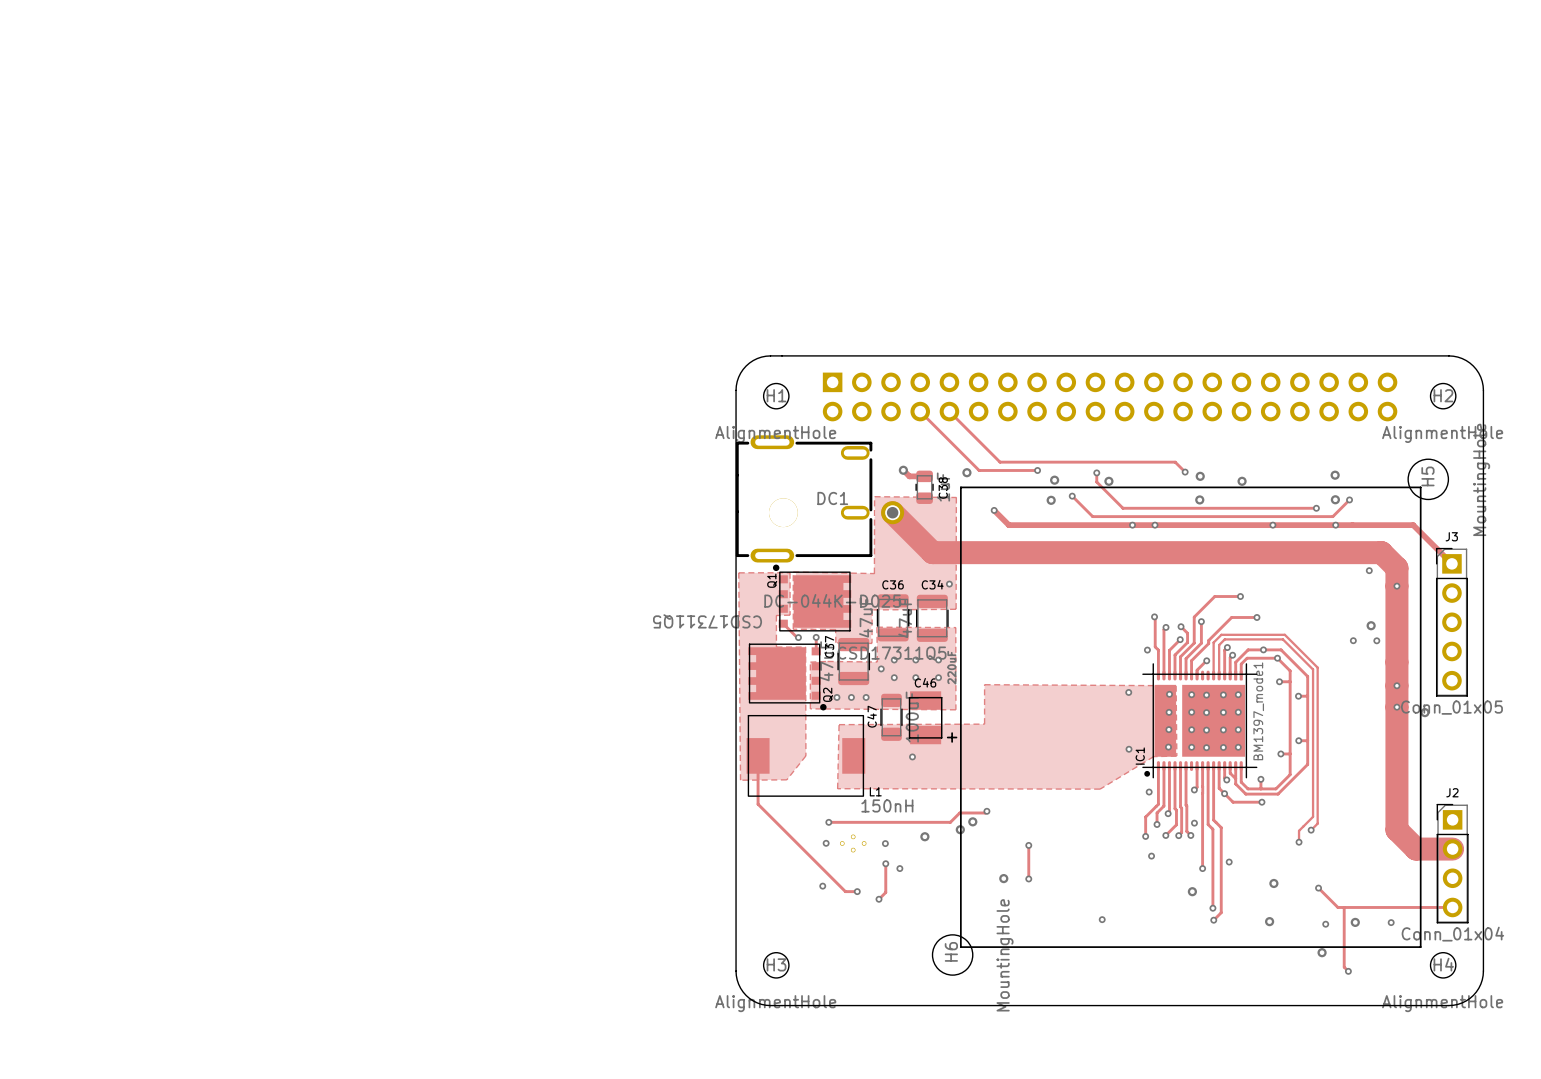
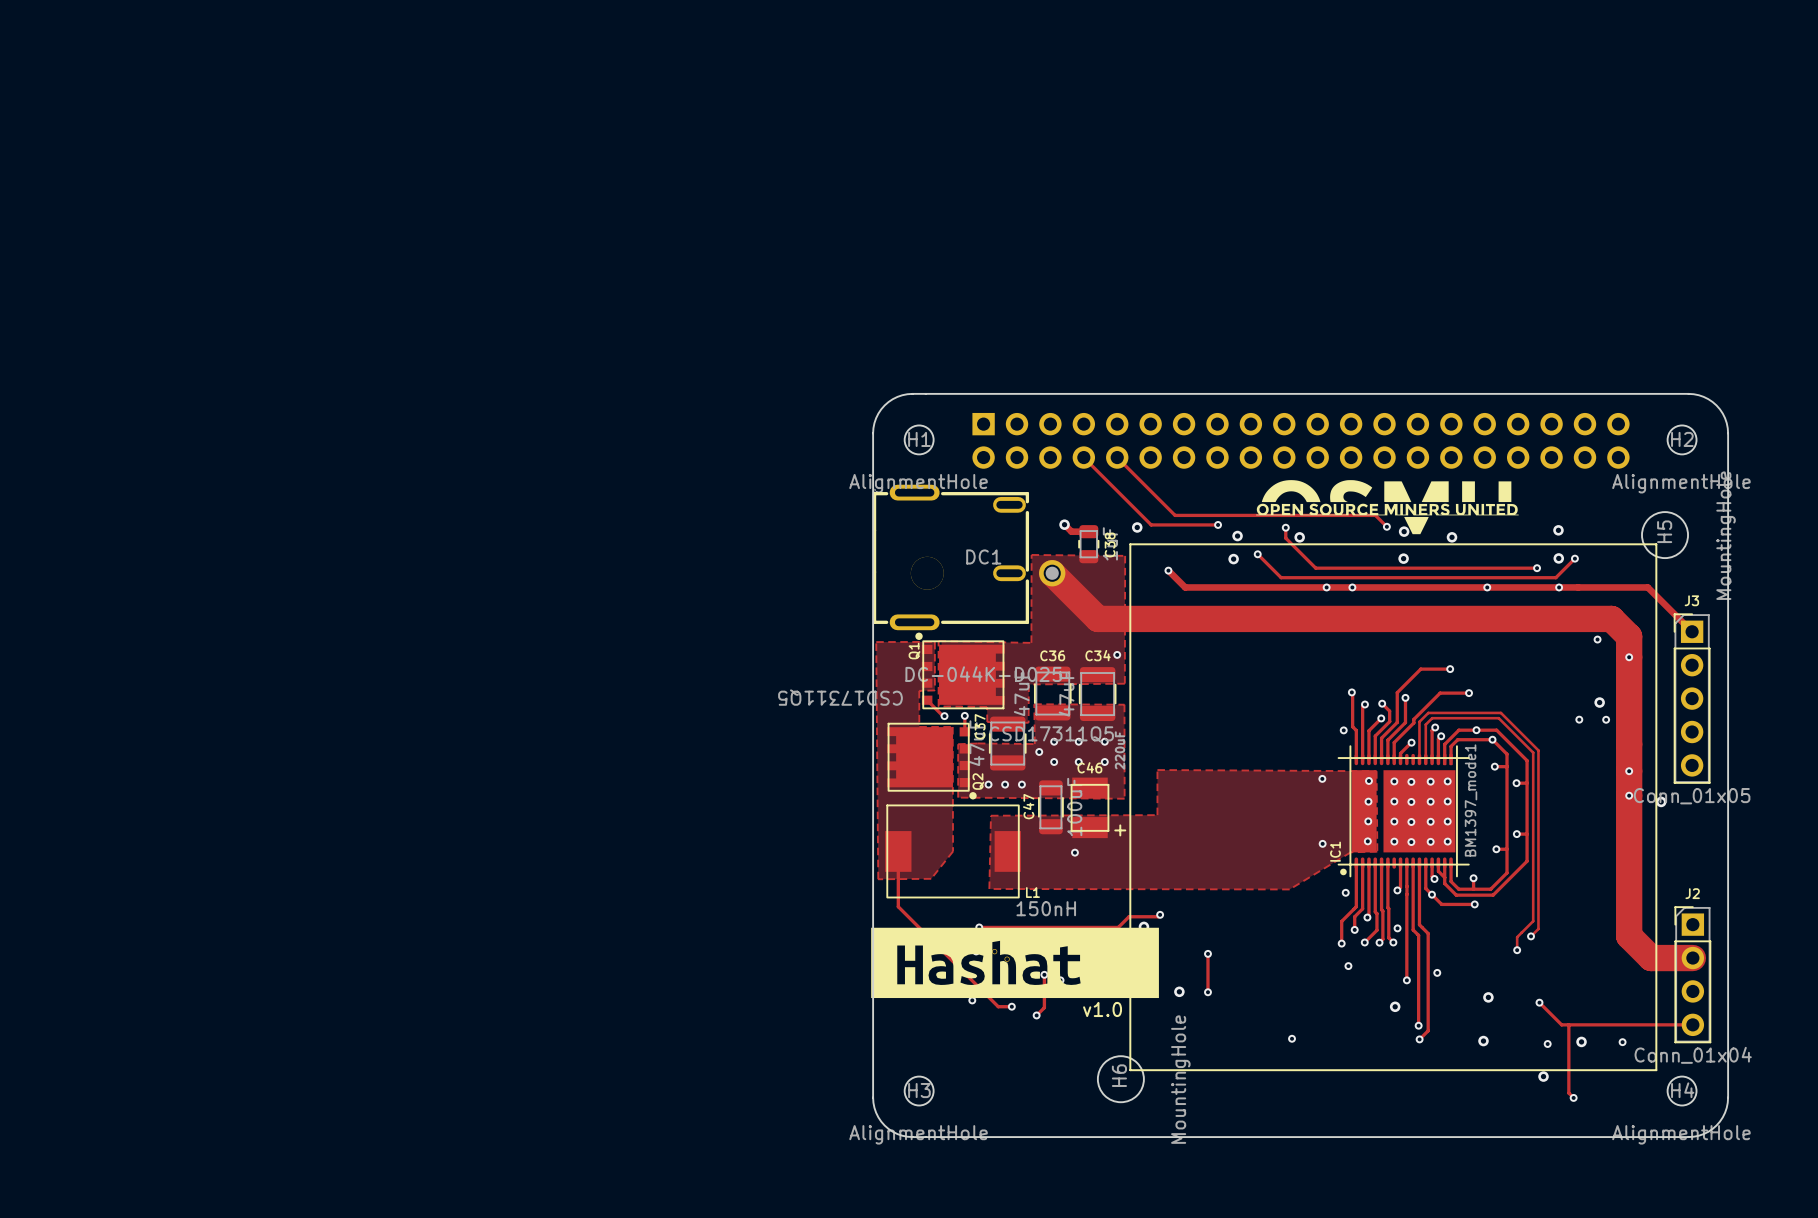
drawing: none -> [1256, 480, 1519, 535]
drawing: none -> [871, 927, 1159, 999]
text: none -> v1.0 (1102, 1009)

